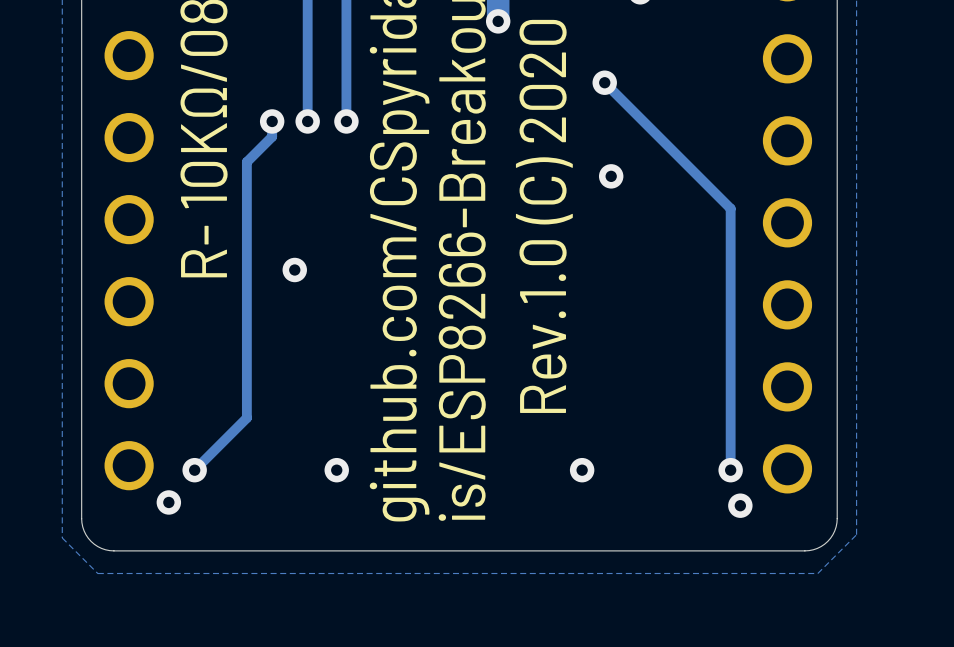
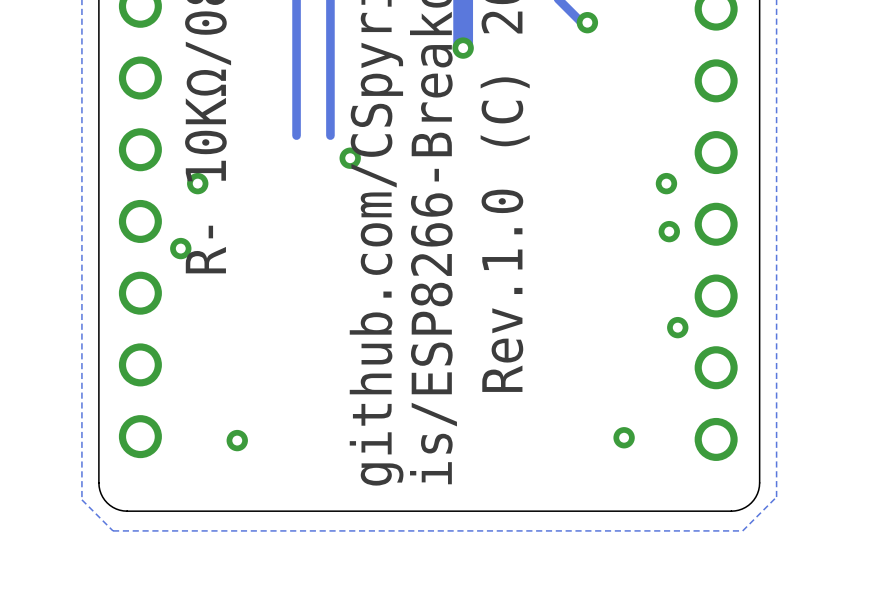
track: (604, 82) (730, 208) (730, 470) -> none
via: (604, 82) -> none
track: (272, 121) (272, 136) (246, 162) (246, 417) (194, 470) -> none
via: (272, 121) -> none
via: (307, 121) -> none
via: (346, 121) -> none
via: none -> (350, 158)
via: none -> (197, 183)
via: (611, 176) -> none
via: none -> (666, 183)
via: none -> (669, 231)
via: none -> (180, 248)
via: (294, 269) -> none
via: none -> (677, 327)
via: none -> (624, 437)
via: (194, 470) -> none
via: none -> (237, 440)
via: (336, 470) -> none
via: (582, 470) -> none
via: (730, 470) -> none
via: (168, 502) -> none
via: (740, 505) -> none

